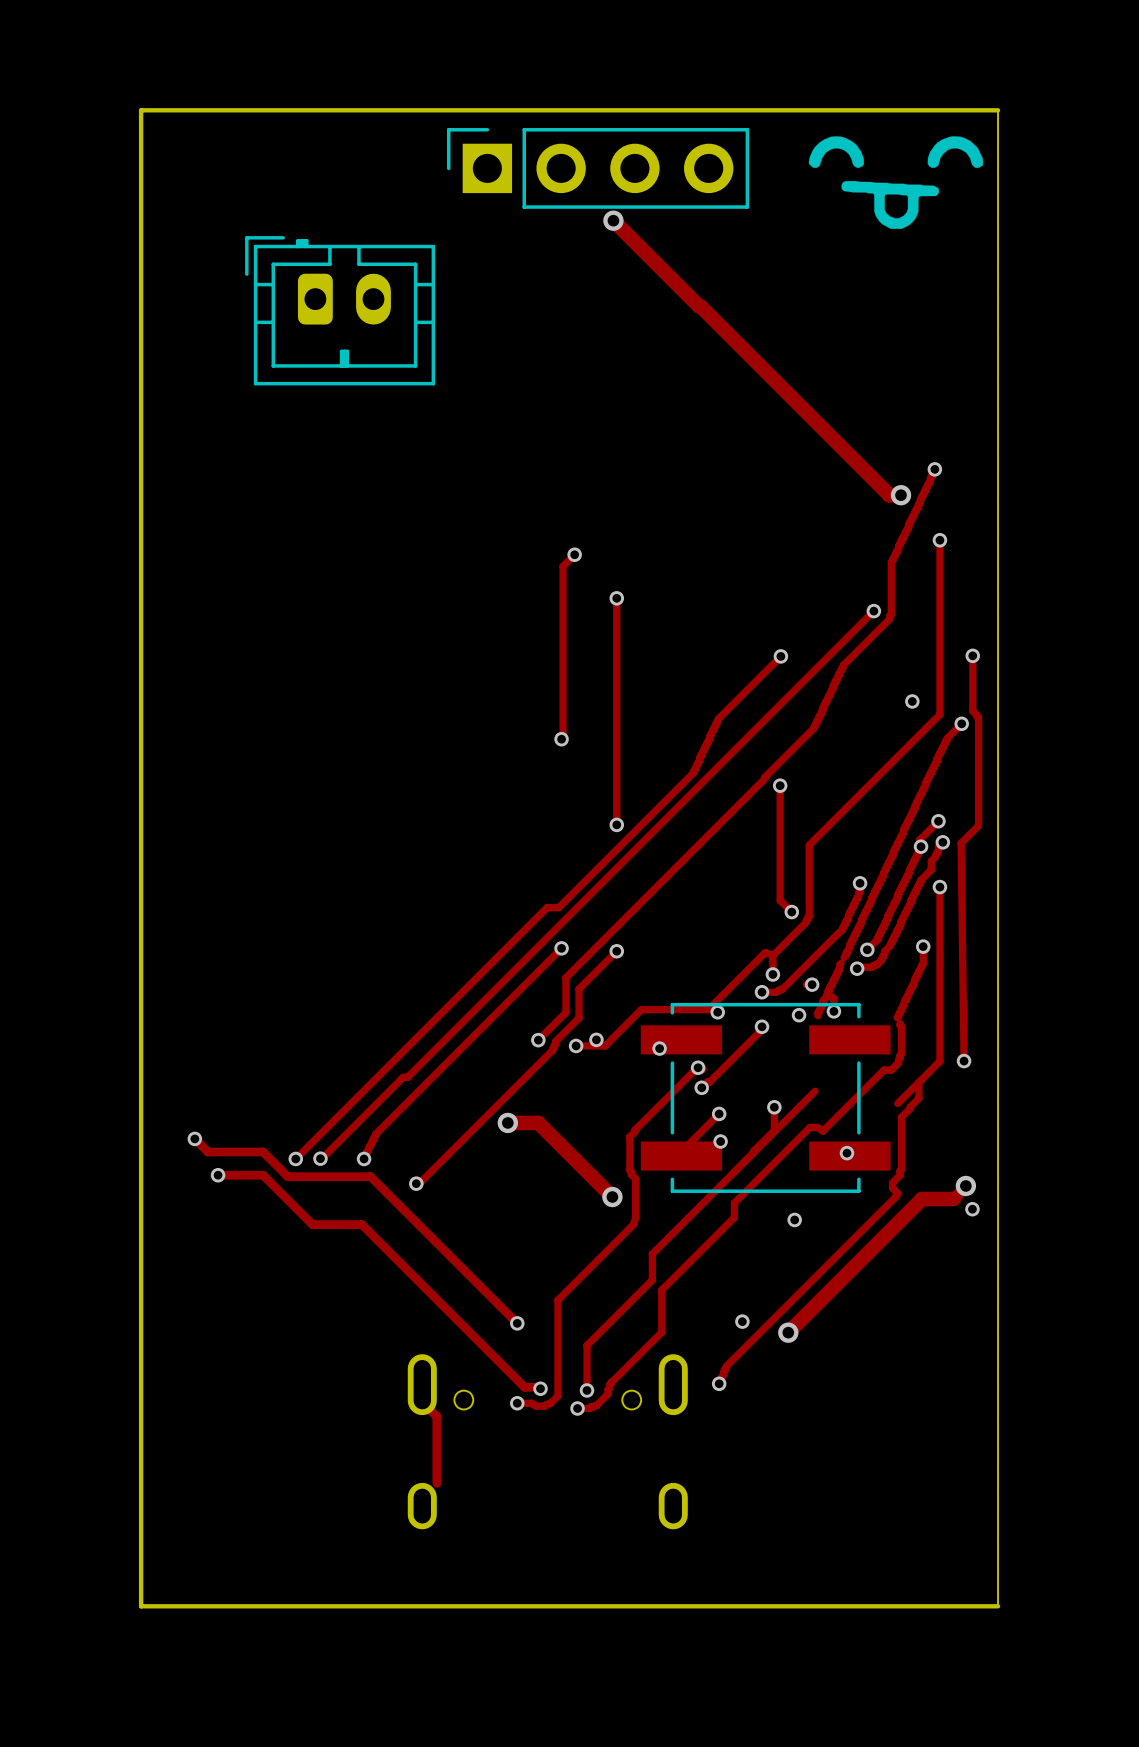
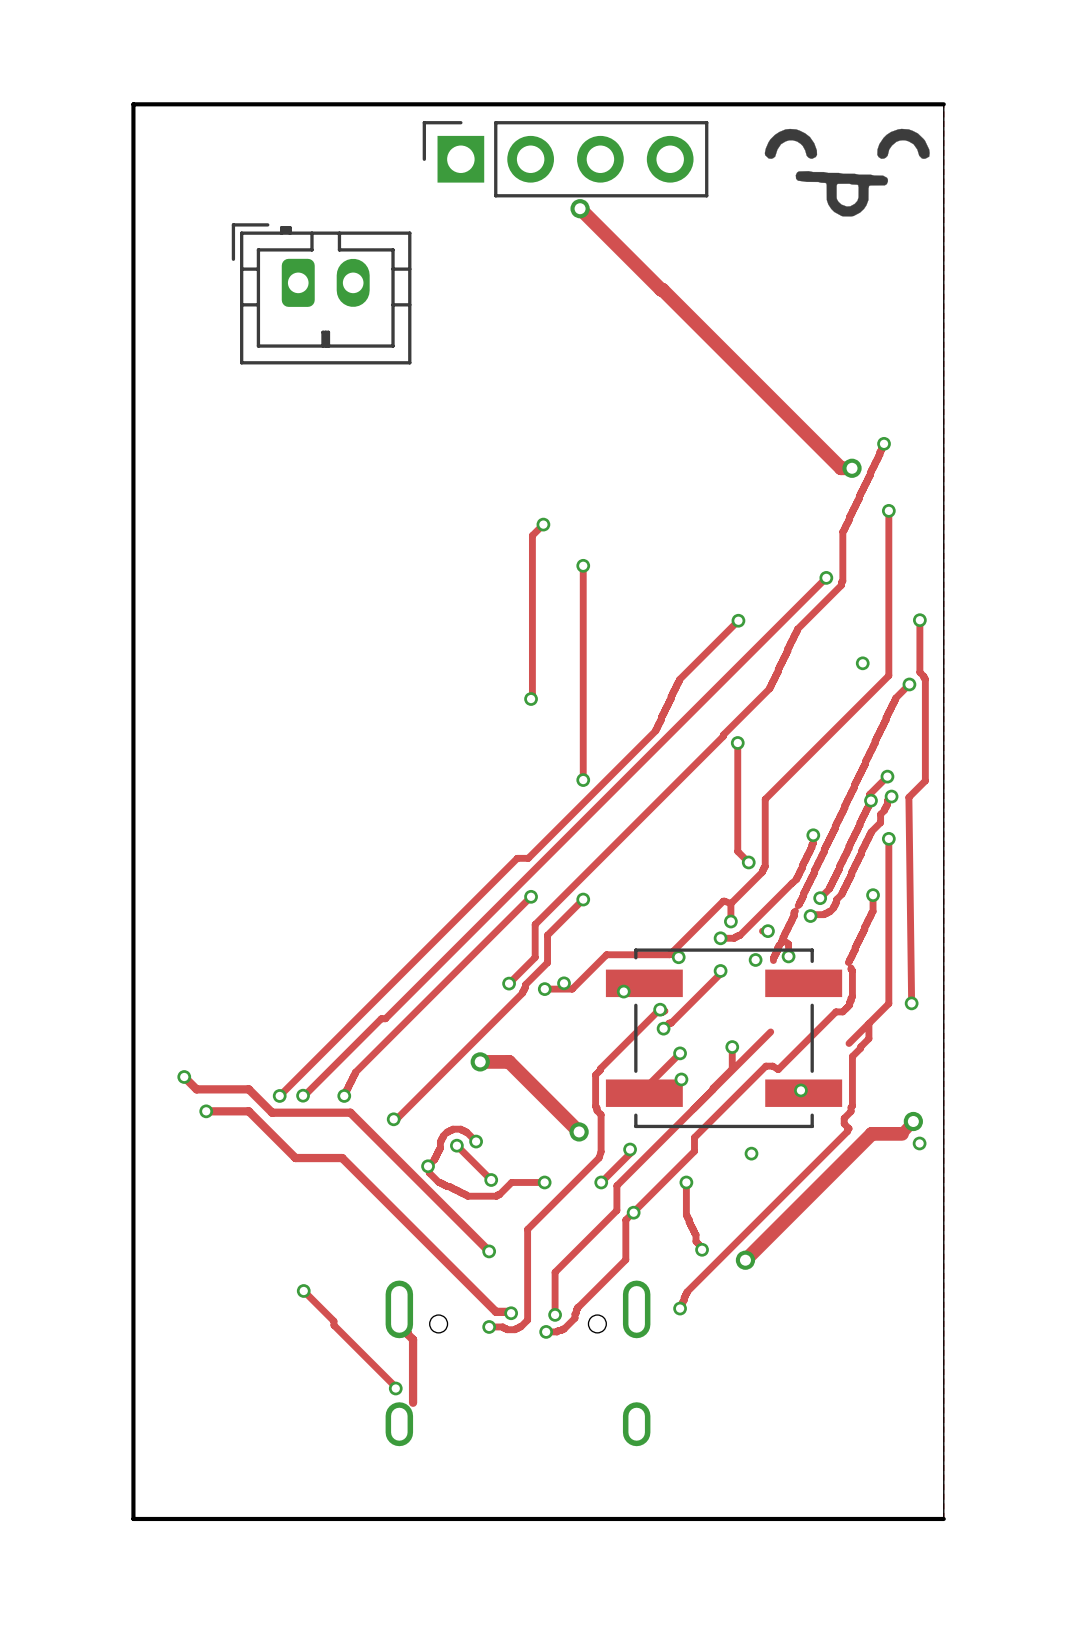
track: none -> (476, 1141) (461, 1129) (452, 1129) (447, 1131) (440, 1141) (440, 1148) (434, 1159) (428, 1166) (429, 1172) (438, 1182) (467, 1196) (496, 1196) (511, 1182) (544, 1182)
via: none -> (476, 1141)
track: none -> (456, 1145) (491, 1180)
via: none -> (456, 1145)
track: none -> (630, 1149) (630, 1153) (601, 1182)
via: none -> (630, 1149)
via: none -> (428, 1166)
via: none -> (491, 1180)
via: none -> (544, 1182)
via: none -> (601, 1182)
track: none -> (686, 1182) (686, 1215) (696, 1234) (696, 1241) (702, 1249)
via: none -> (686, 1182)
via: none -> (633, 1212)
track: none -> (303, 1290) (333, 1321) (333, 1325) (395, 1388)
via: none -> (303, 1290)
via: none -> (395, 1388)

